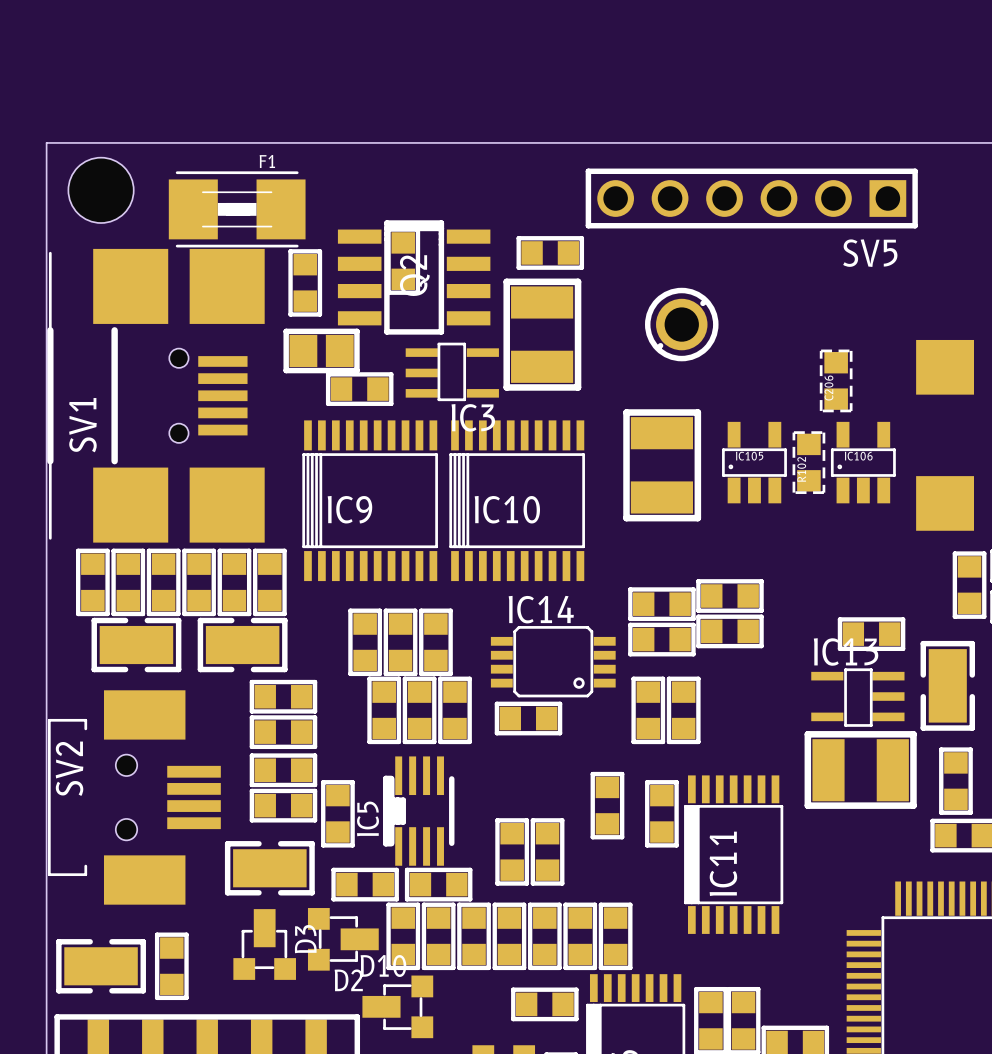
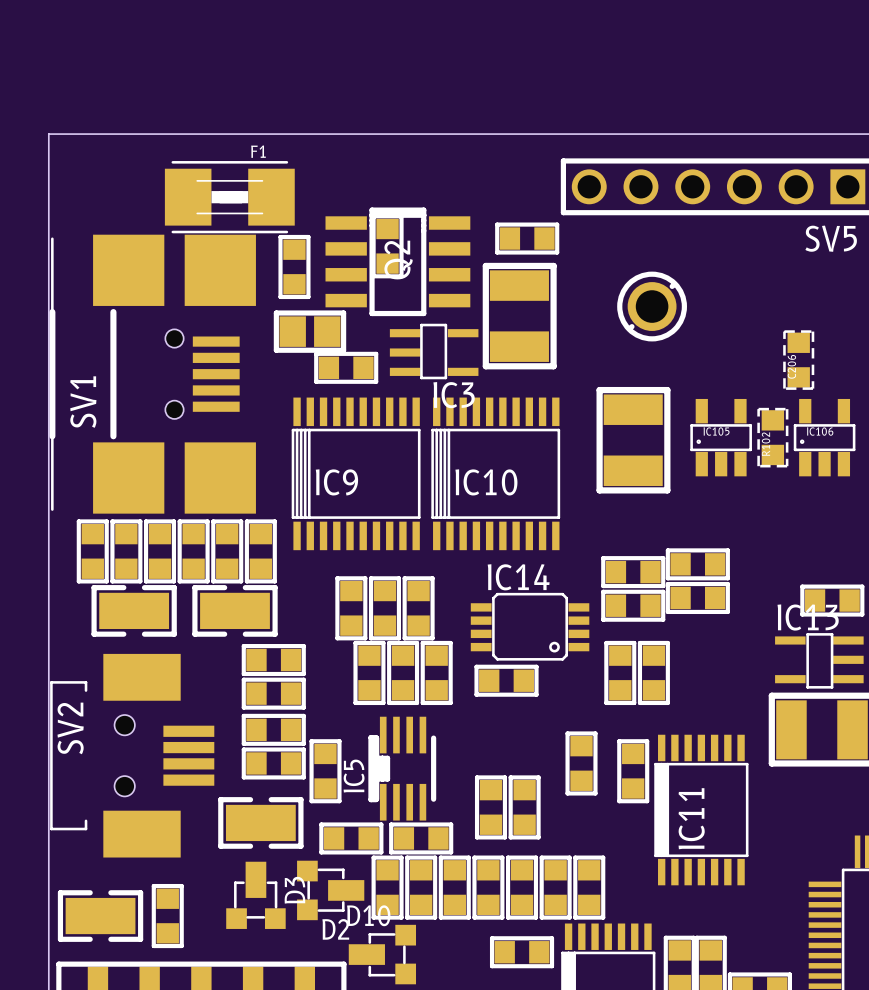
part: (101, 190) -> none

